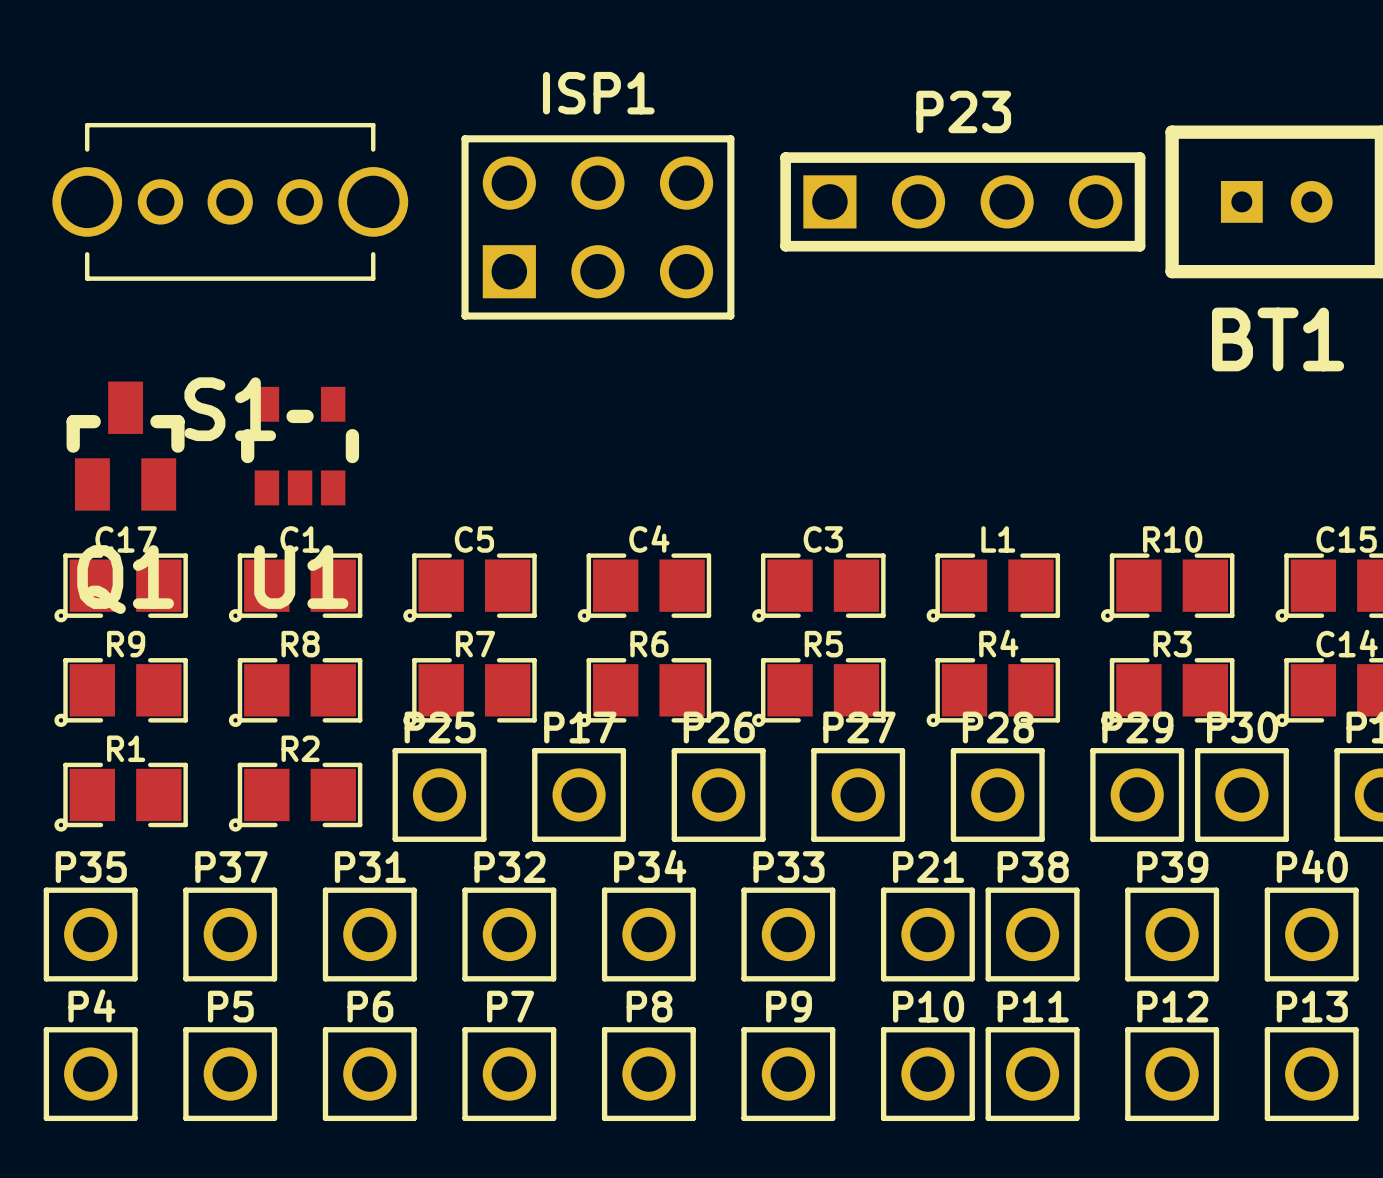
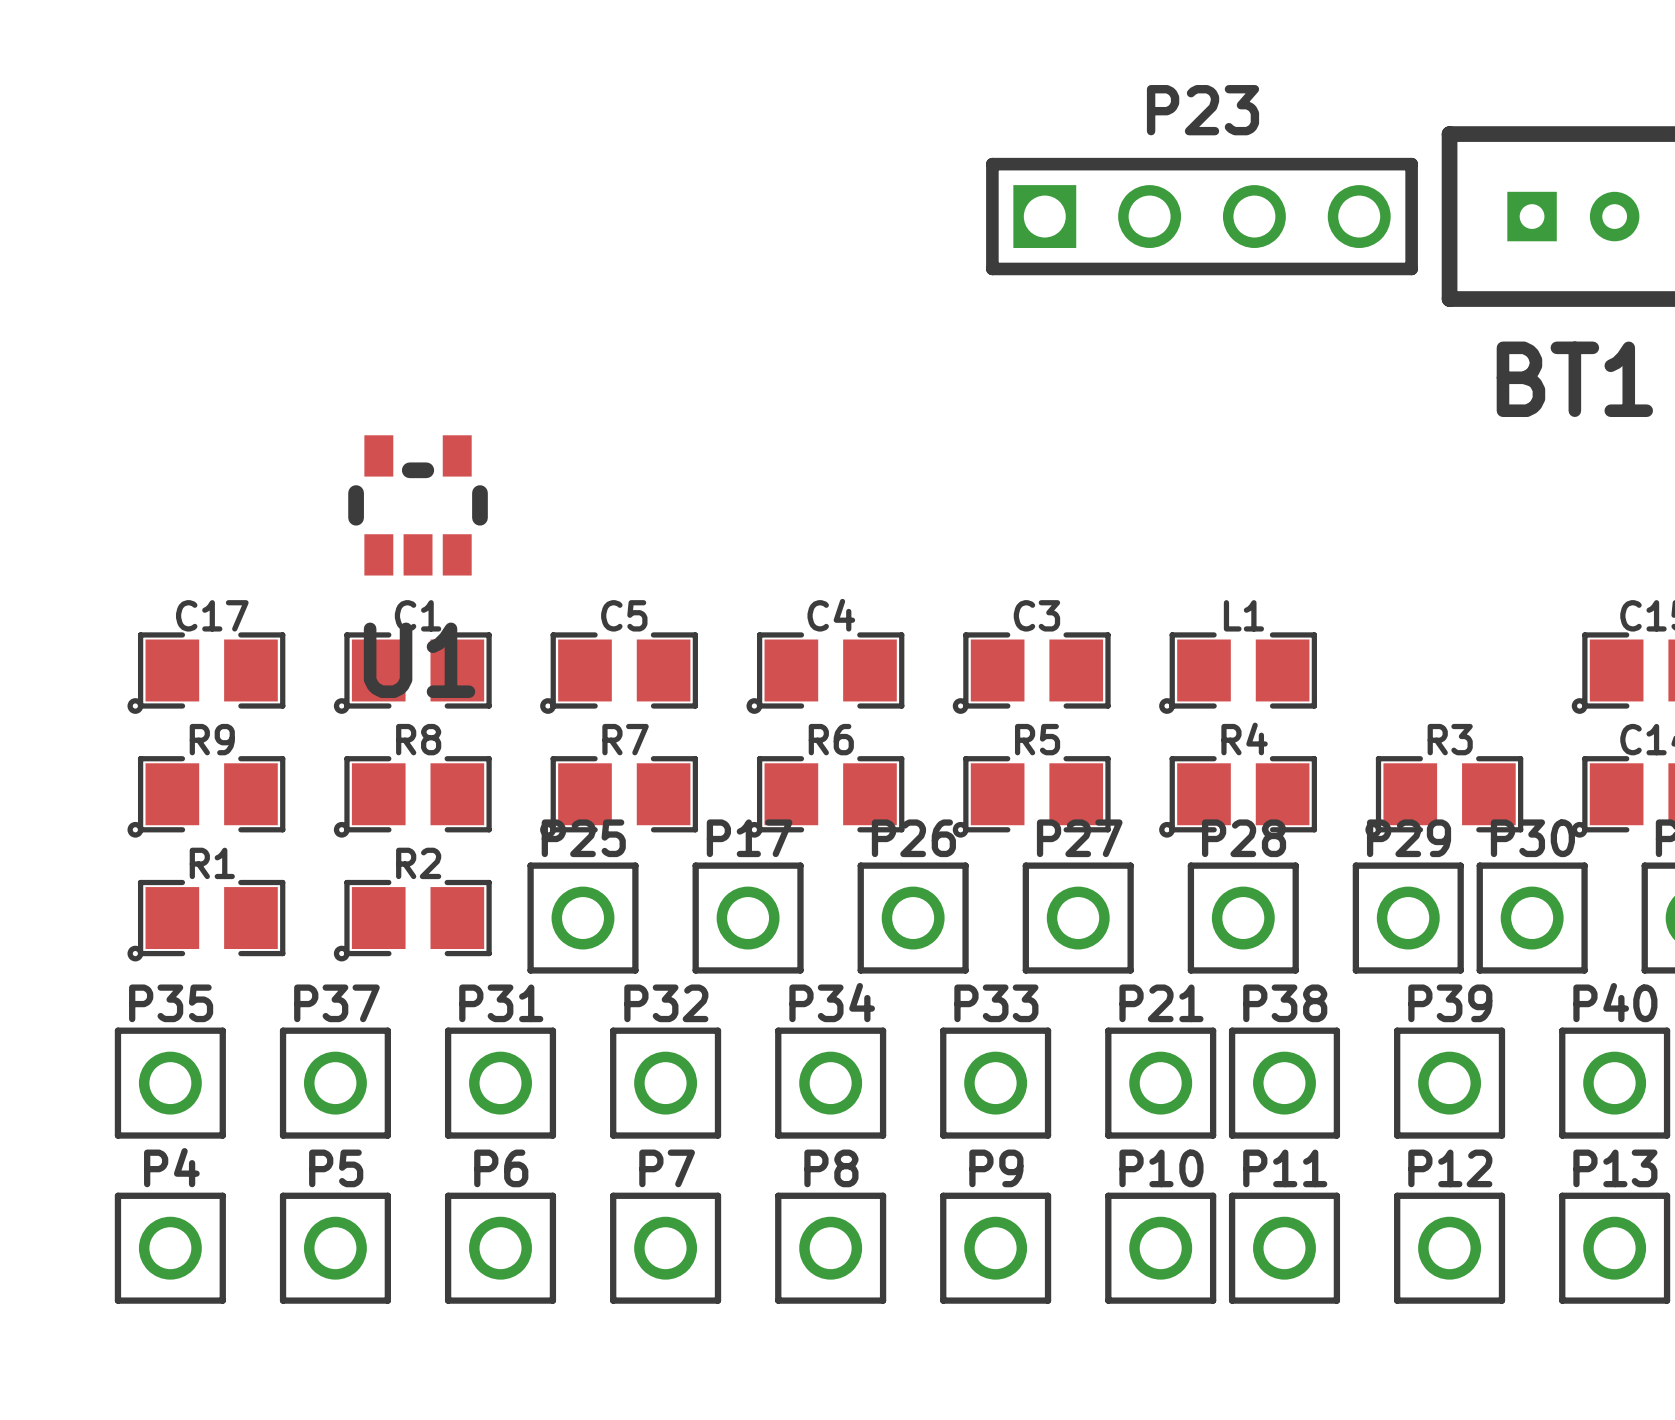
S1: (230, 201) -> none
ISP1: (597, 227) -> none
Q1: (125, 446) -> none
R10: (1167, 587) -> none

